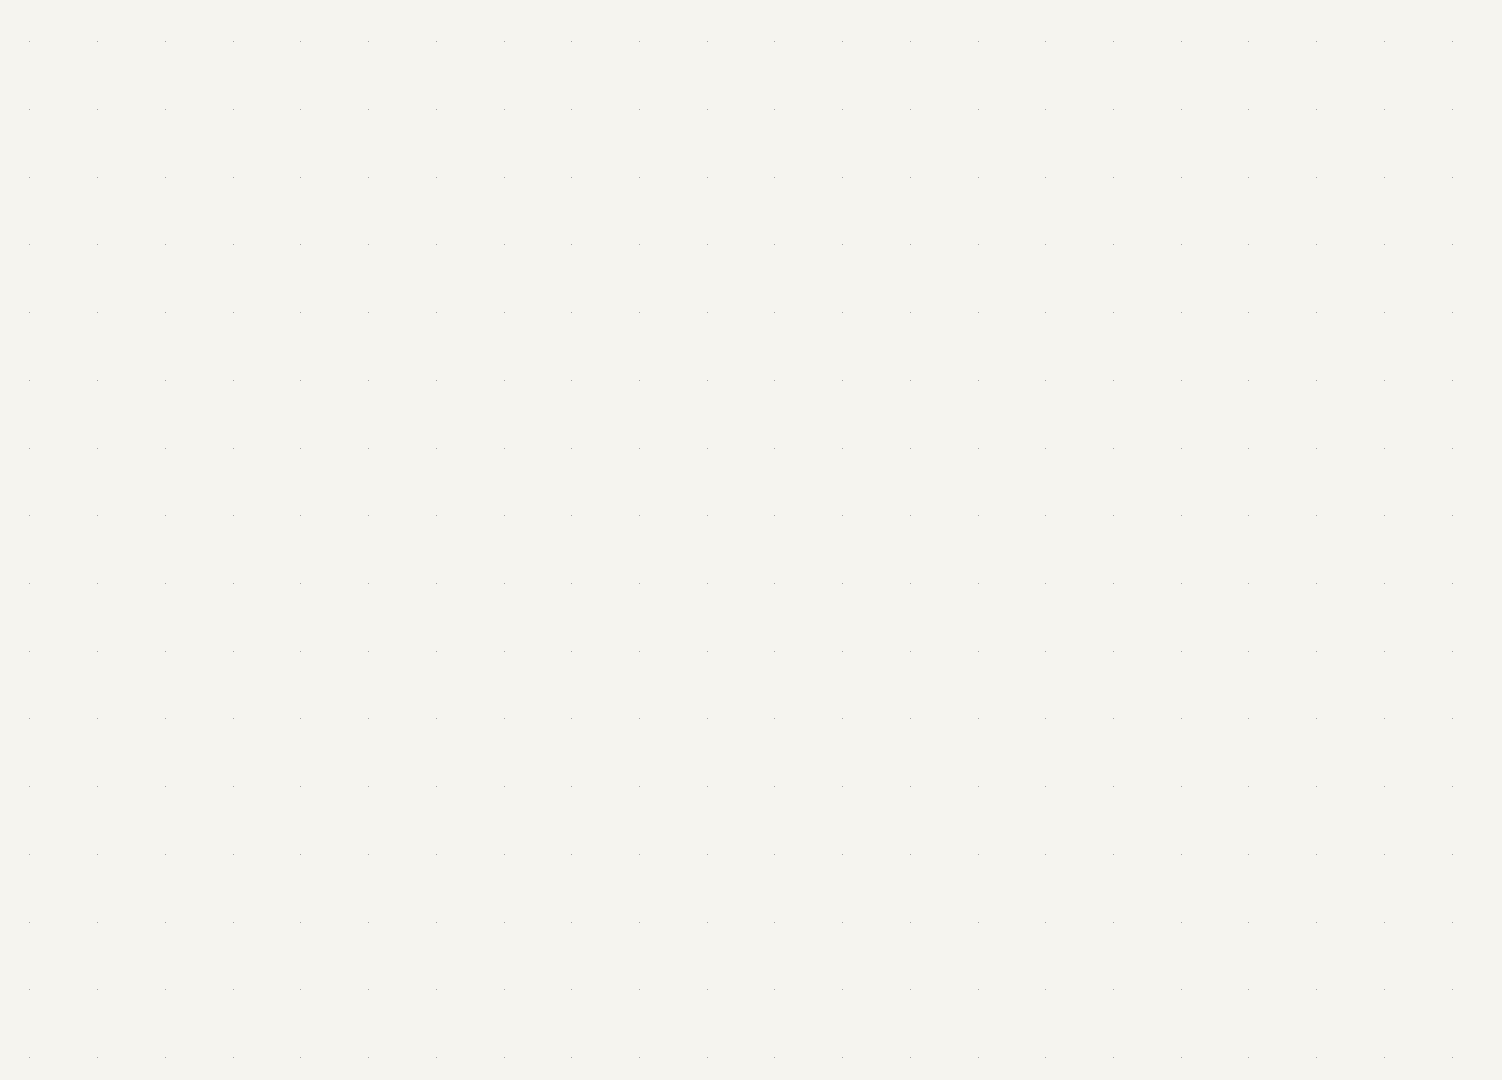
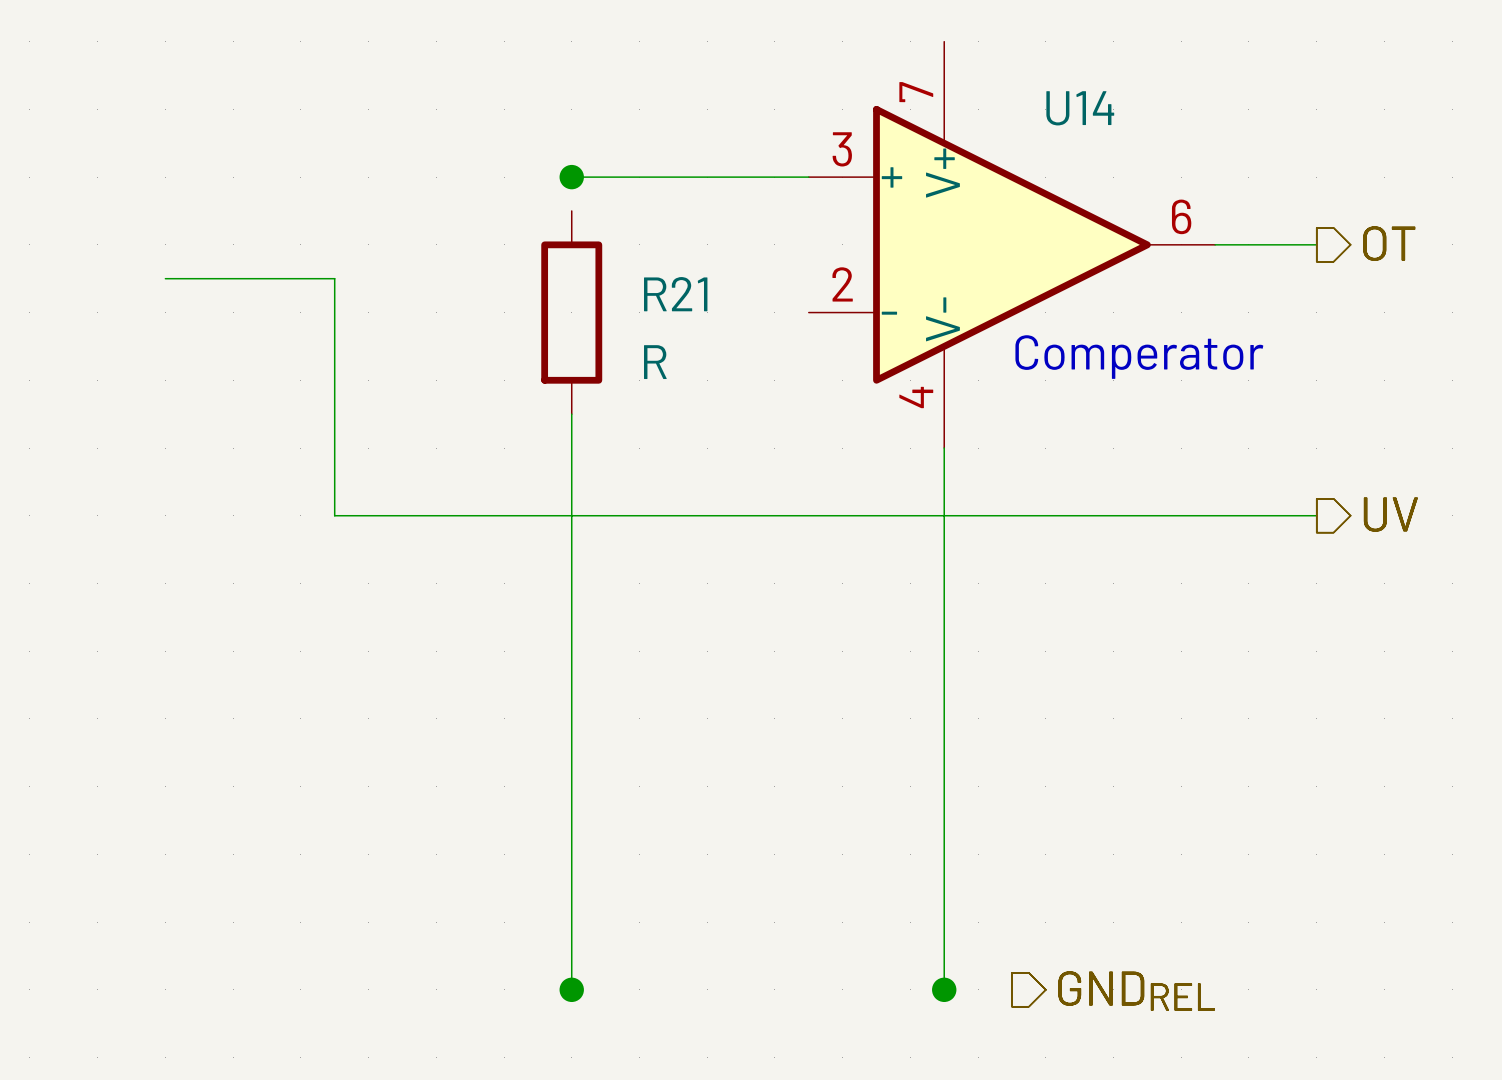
wire: none -> (571, 177) (808, 177)
junction: none -> (571, 177)
hierarchical label: none -> OT (1389, 243)
U14: none -> (1011, 244)
wire: none -> (1215, 244) (1316, 244)
wire: none -> (165, 278) (334, 278) (334, 515) (1316, 515)
R21: none -> R (571, 312)
text: none -> Comperator (1139, 357)
wire: none -> (571, 414) (571, 989)
wire: none -> (944, 448) (944, 989)
hierarchical label: none -> UV (1390, 514)
junction: none -> (571, 989)
junction: none -> (944, 989)
hierarchical label: none -> GNDREL (1136, 990)

